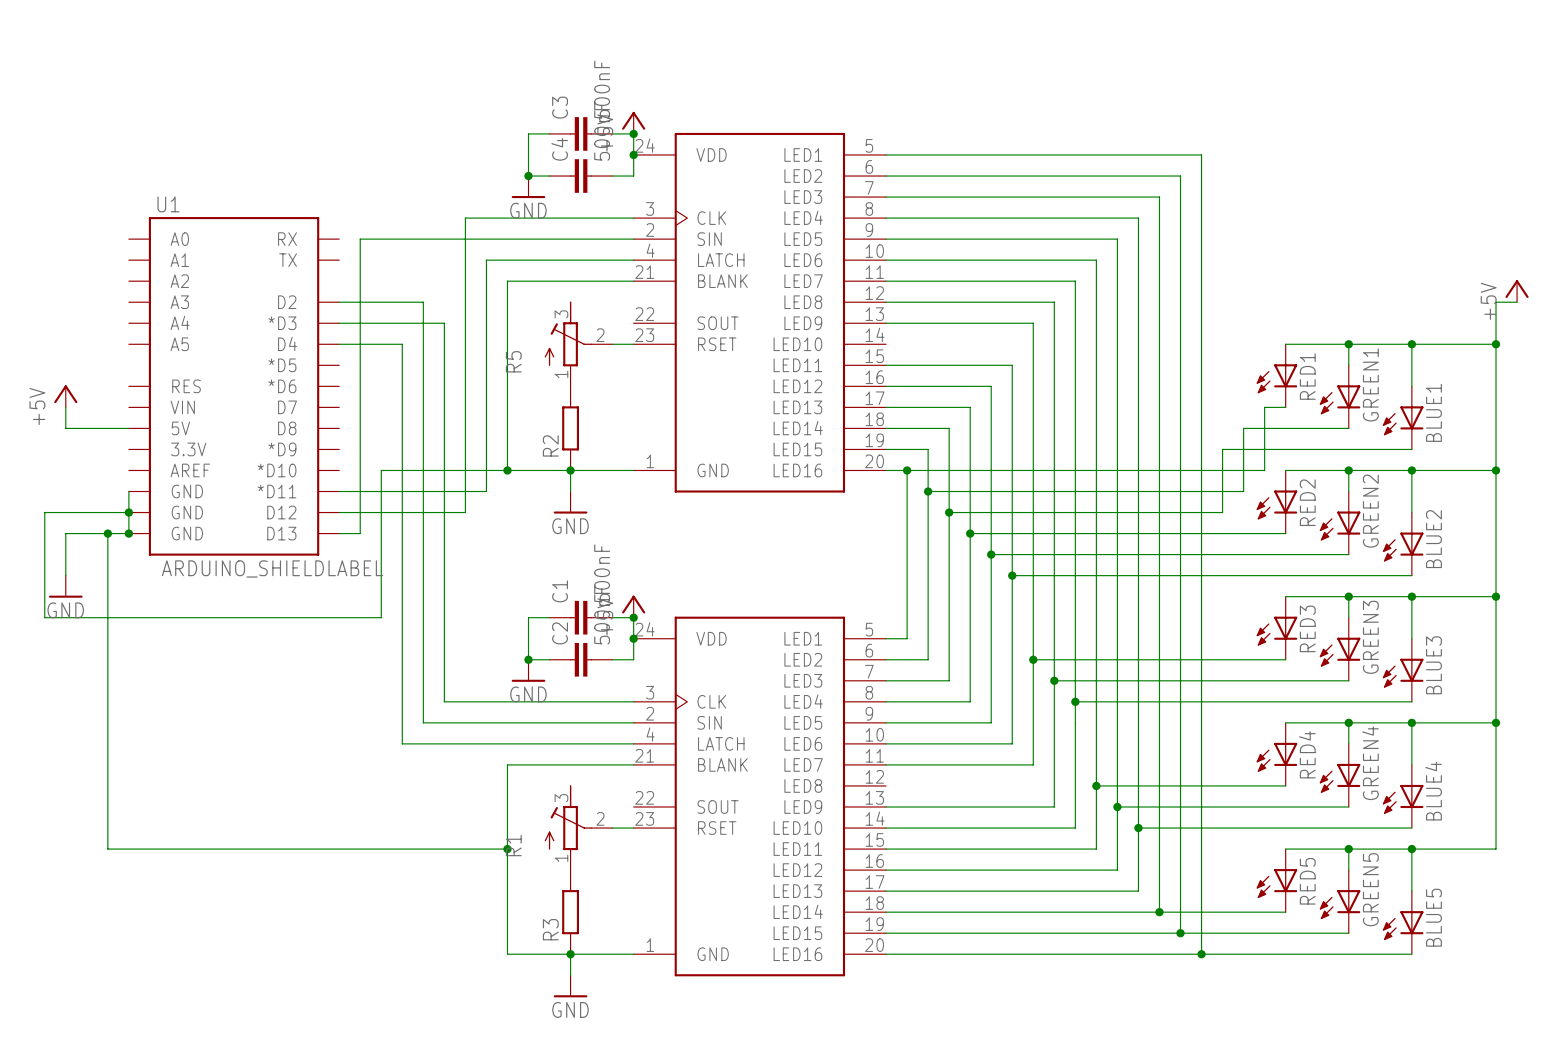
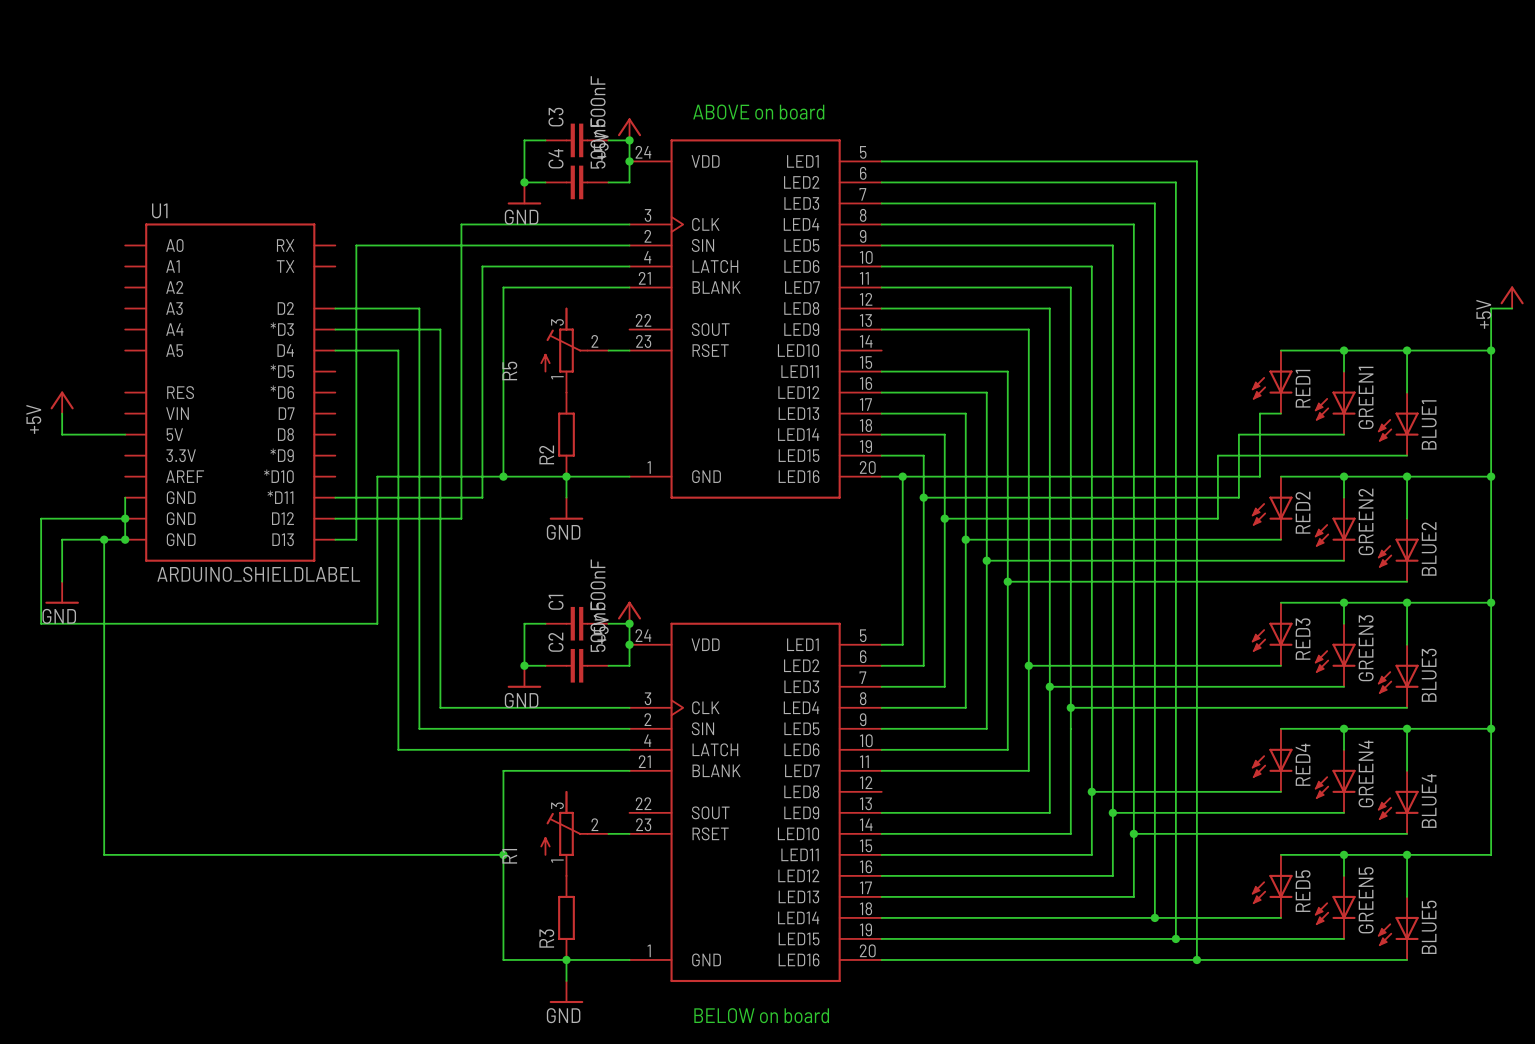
text: none -> ABOVE on board (758, 112)
text: none -> BELOW on board (761, 1015)

